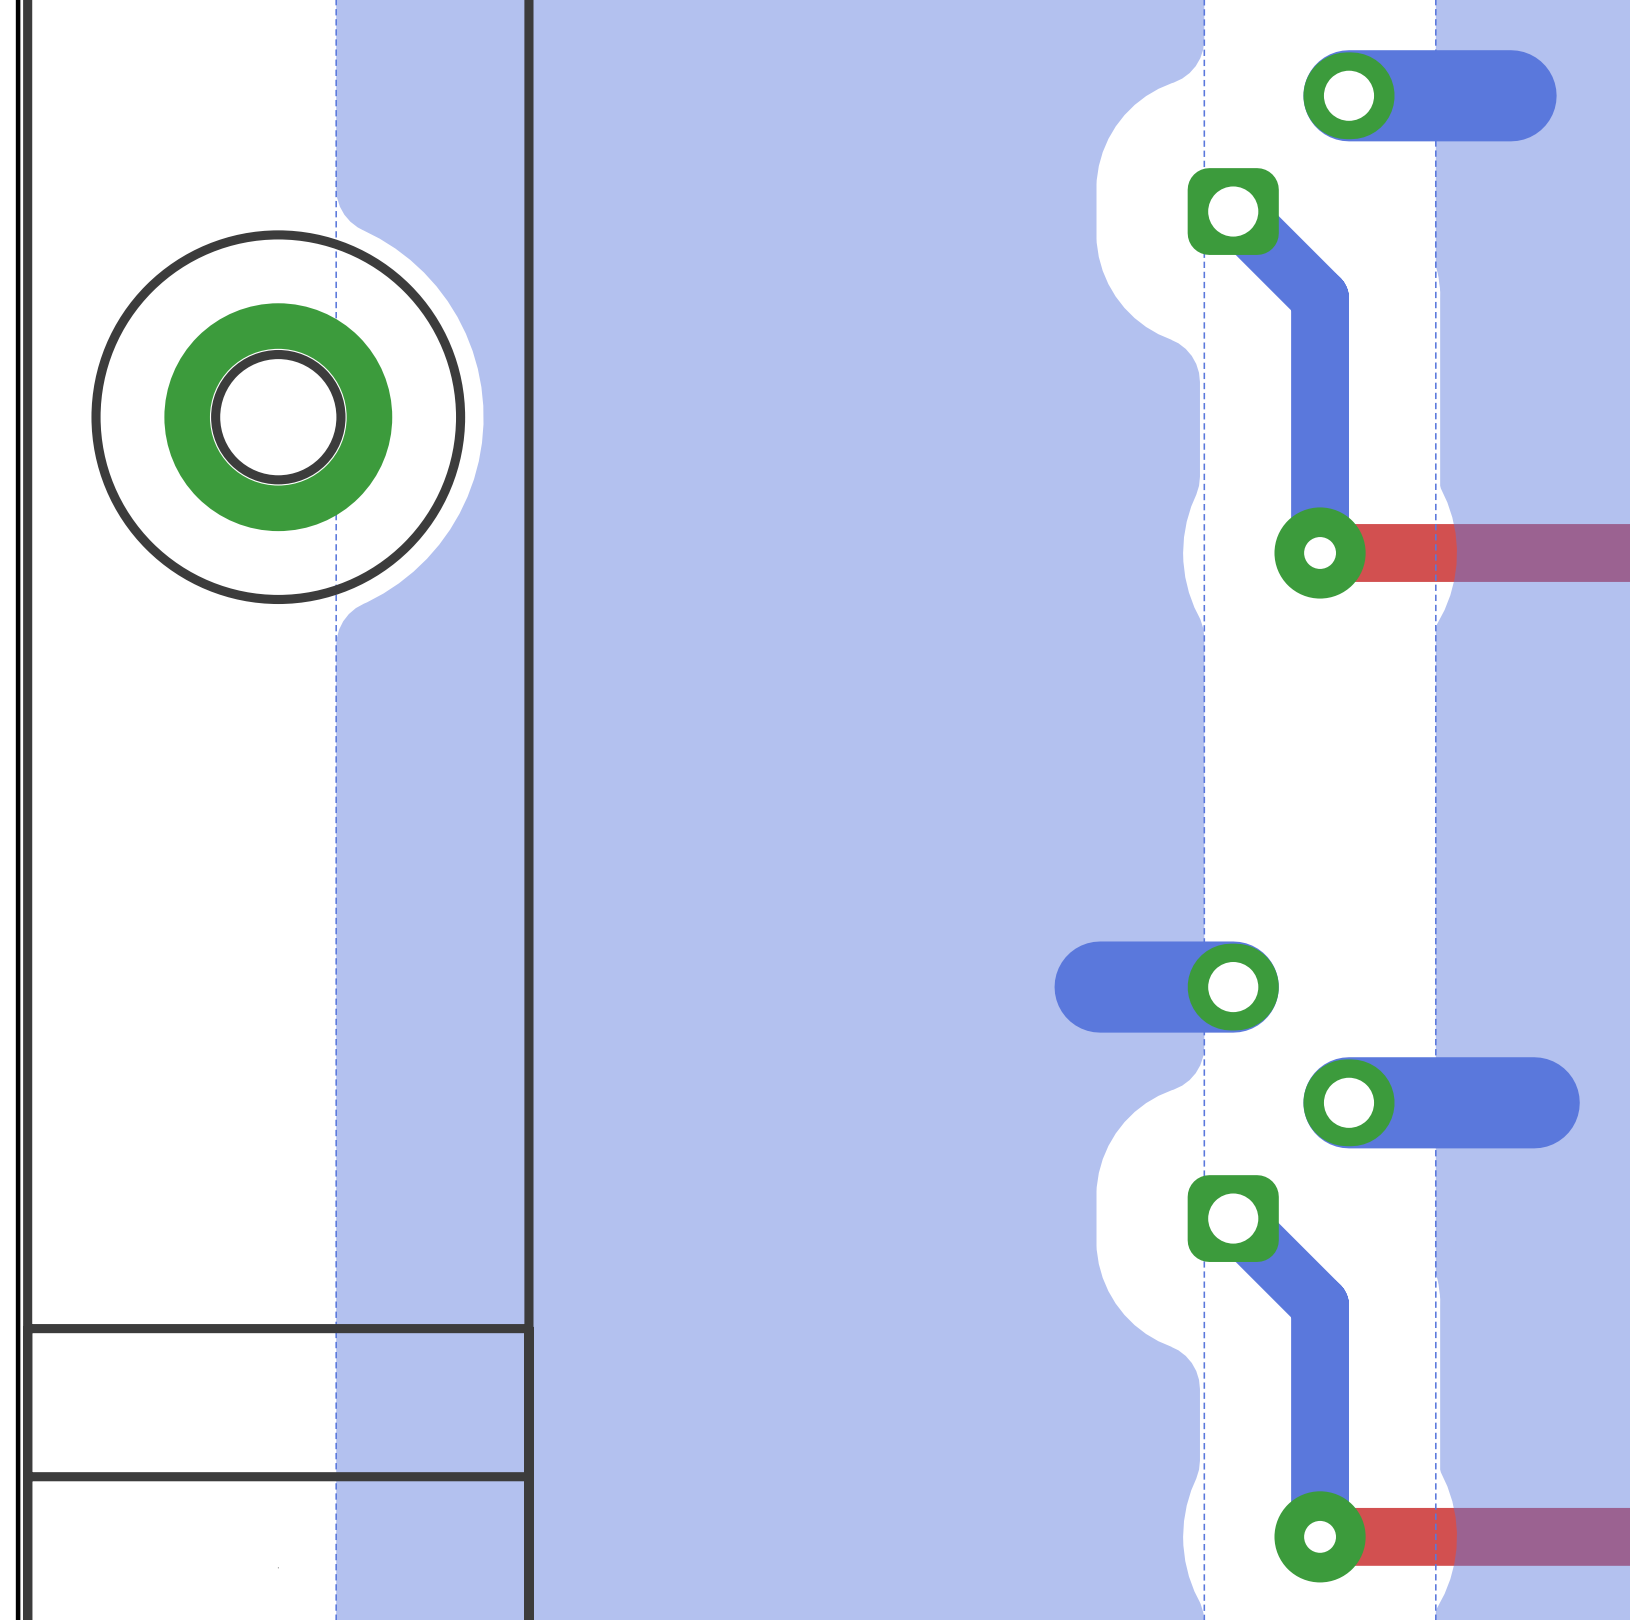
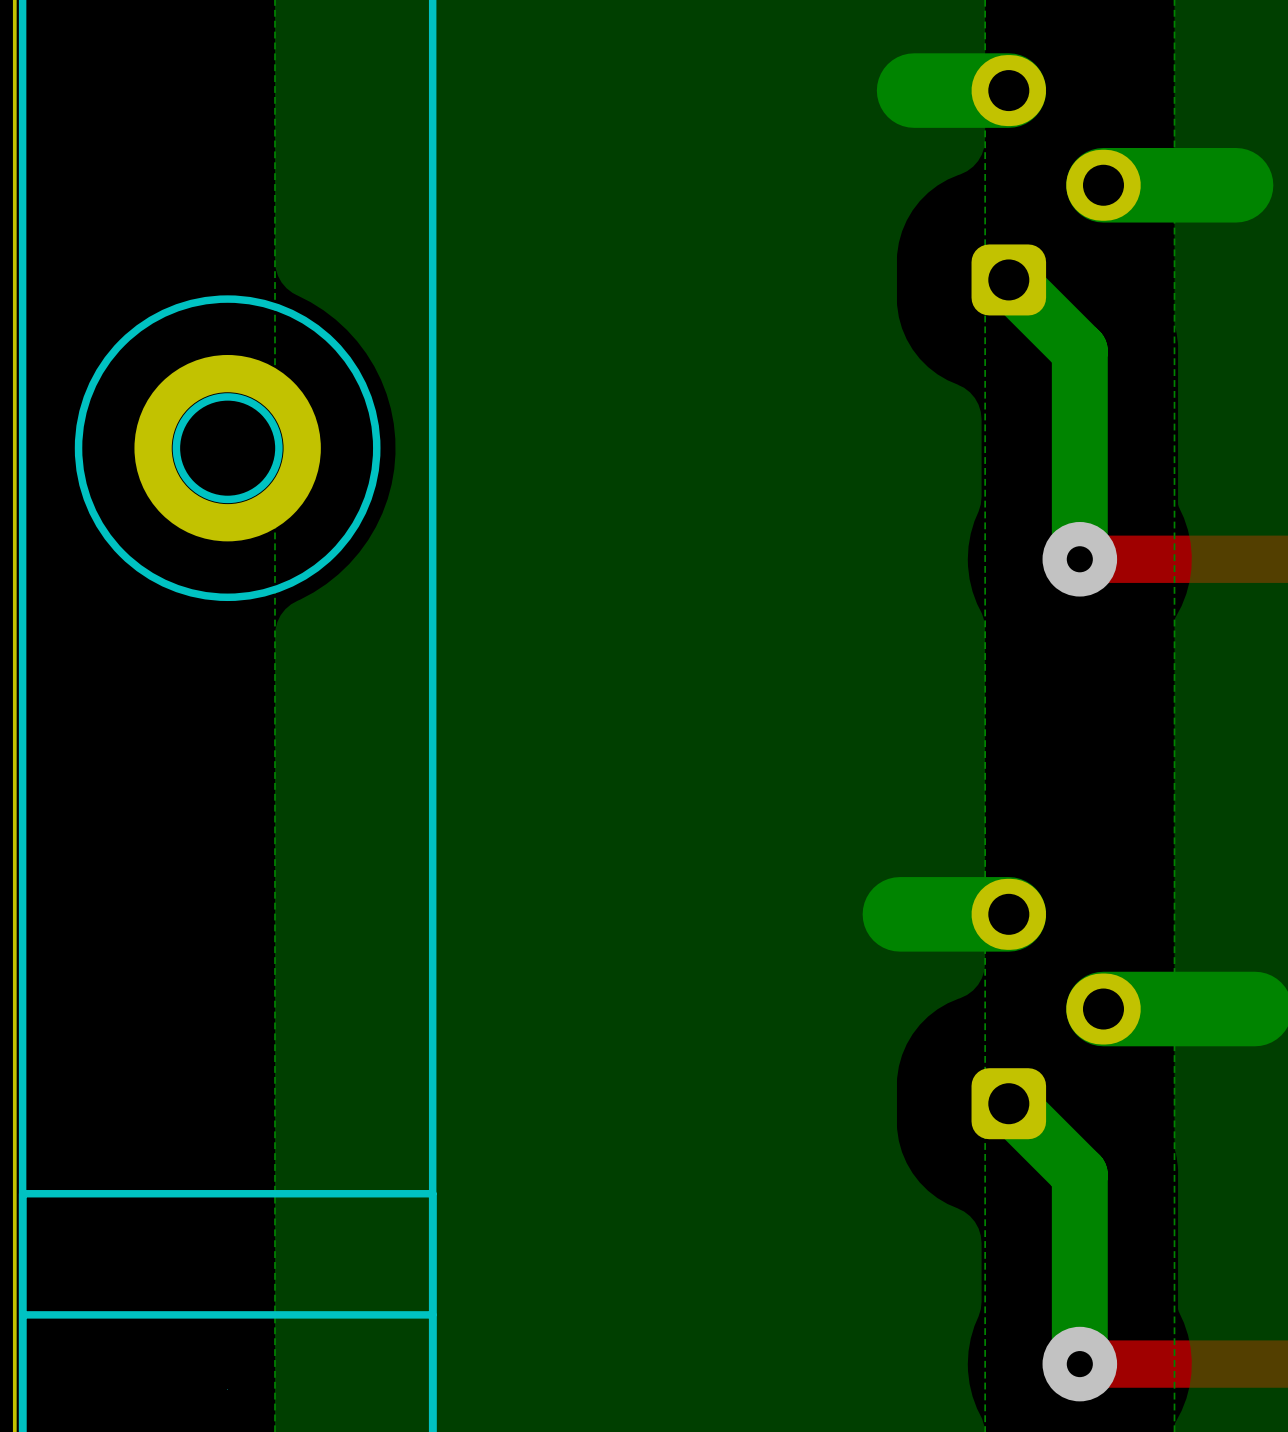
bottom track width: thin (1233, 211) (1320, 298) (1320, 552) -> thick (1008, 279) (1079, 350) (1079, 559)
bottom track width: thin (1233, 1218) (1320, 1305) (1320, 1536) -> thick (1008, 1103) (1079, 1174) (1079, 1364)

